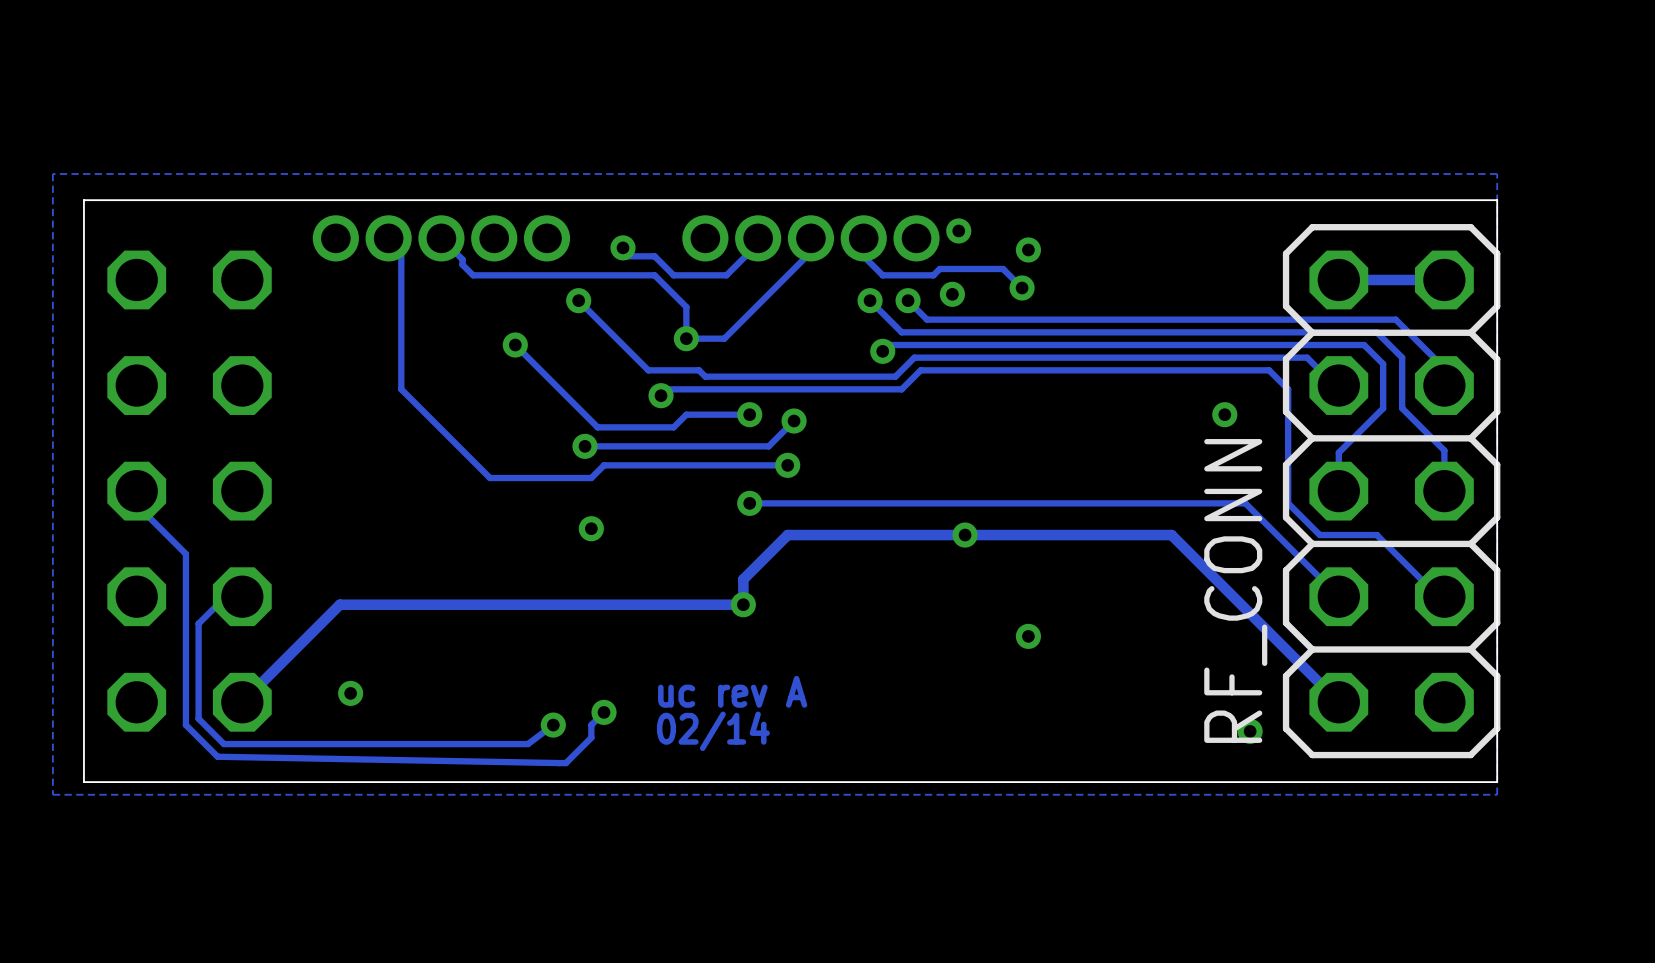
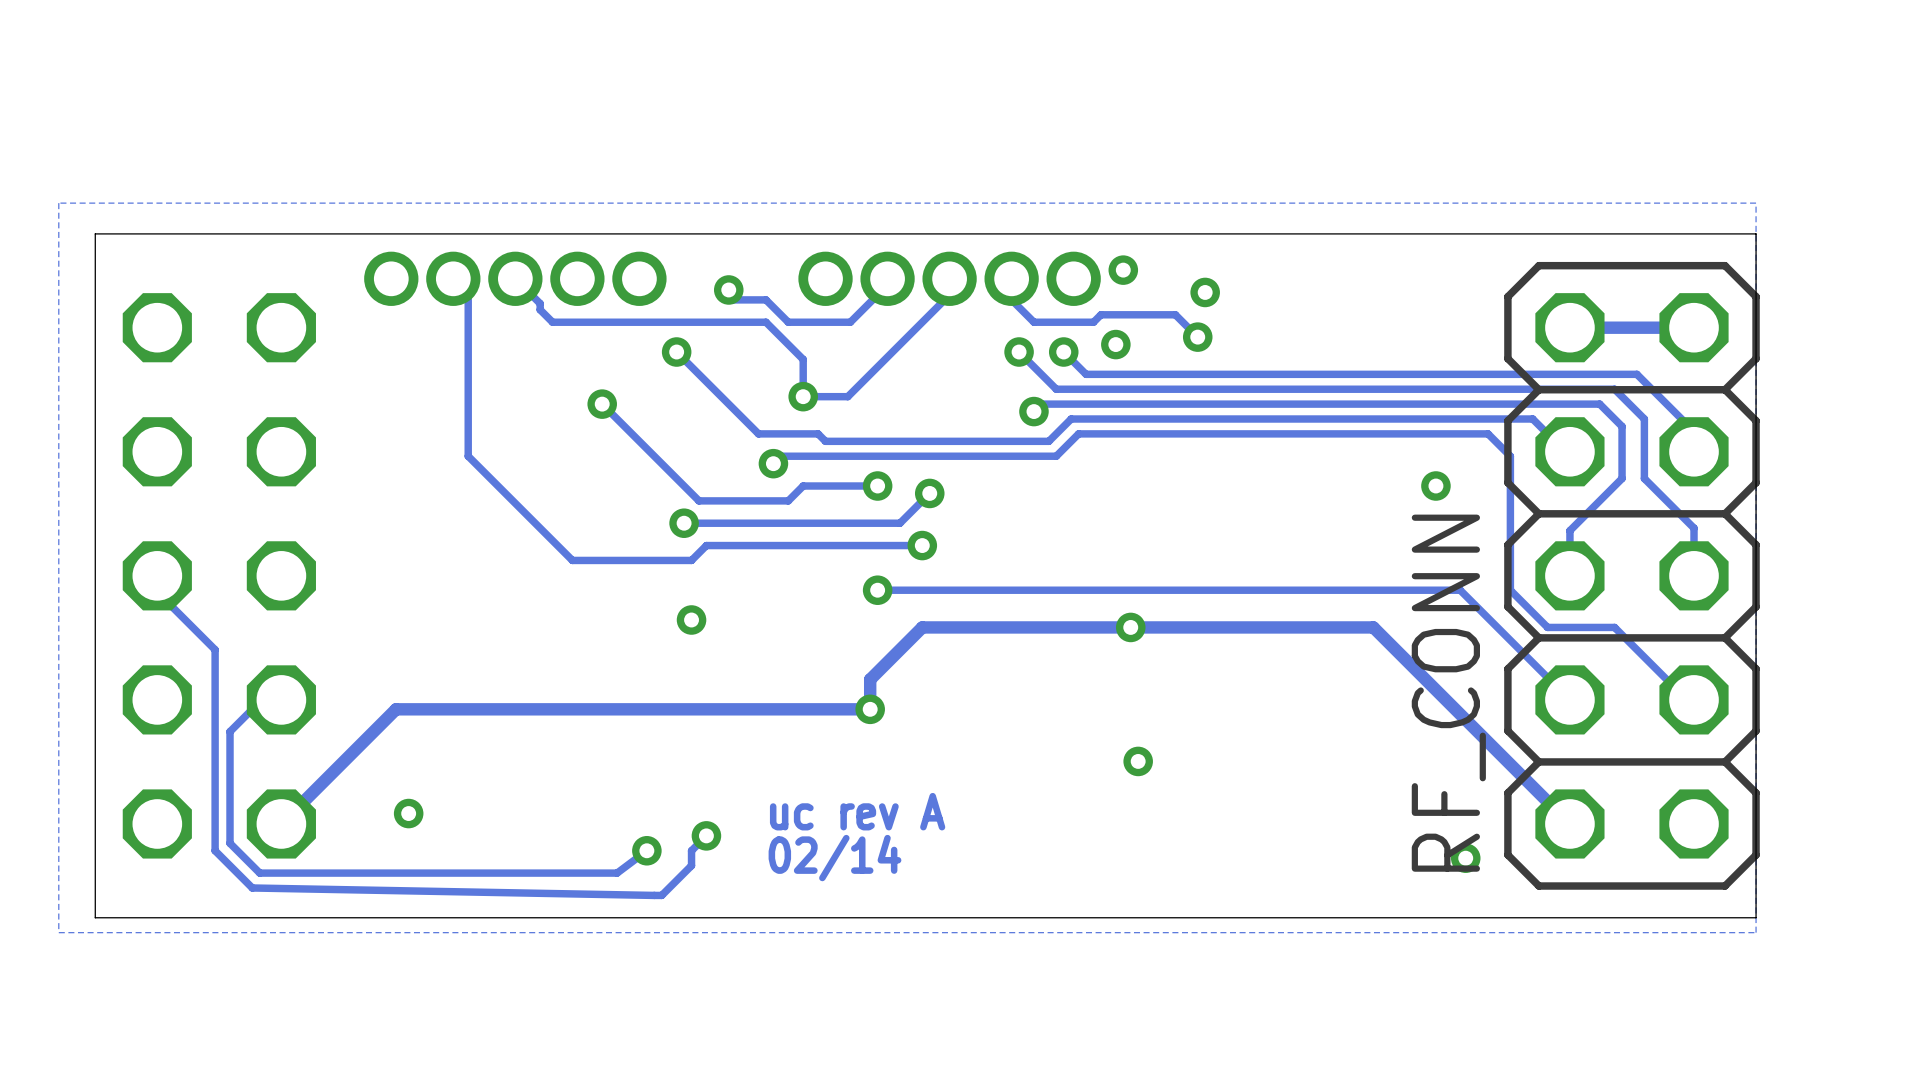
via position: (1028, 636) -> (1138, 761)

